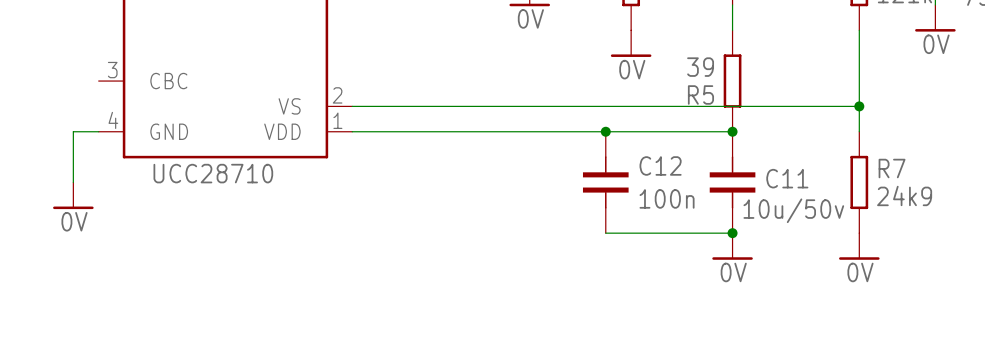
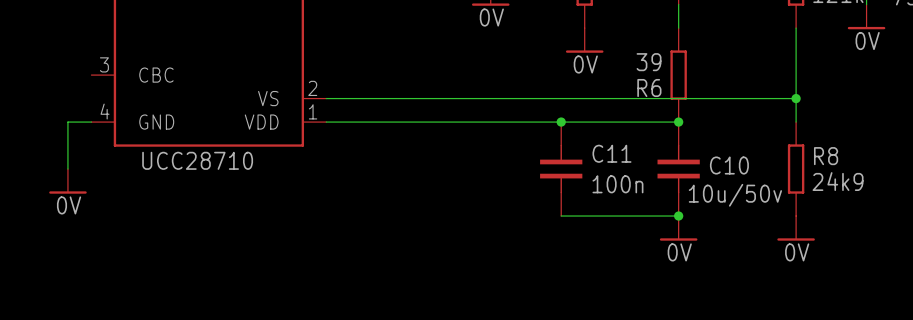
R5 name: R5 (700, 94) -> R6 (649, 88)
C12 name: C12 (660, 165) -> C11 (611, 153)
R7 name: R7 (892, 168) -> R8 (826, 156)
C11 name: C11 (787, 178) -> C10 (729, 165)

